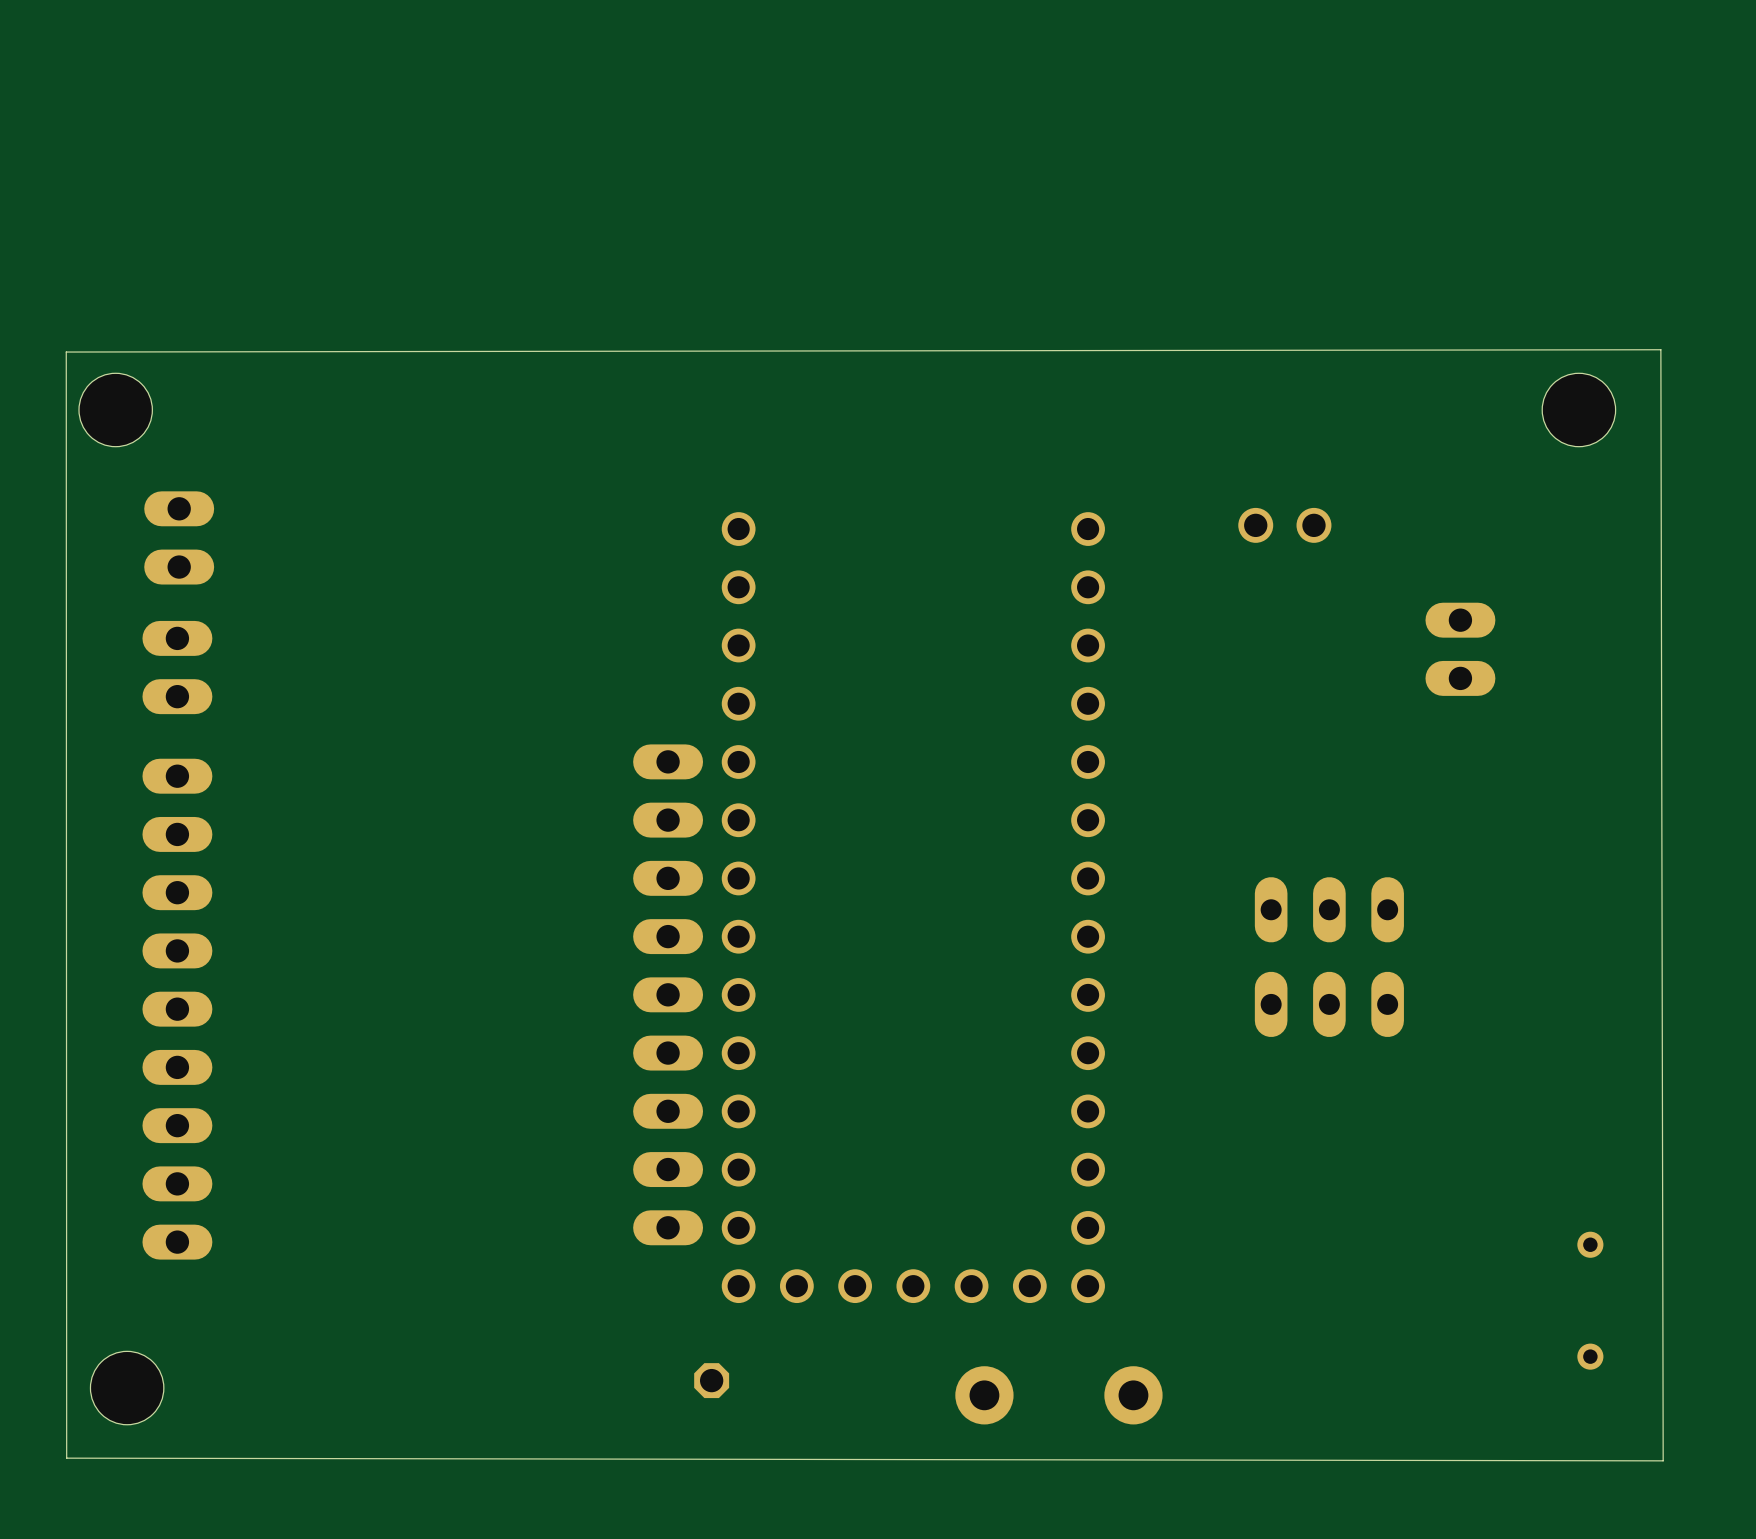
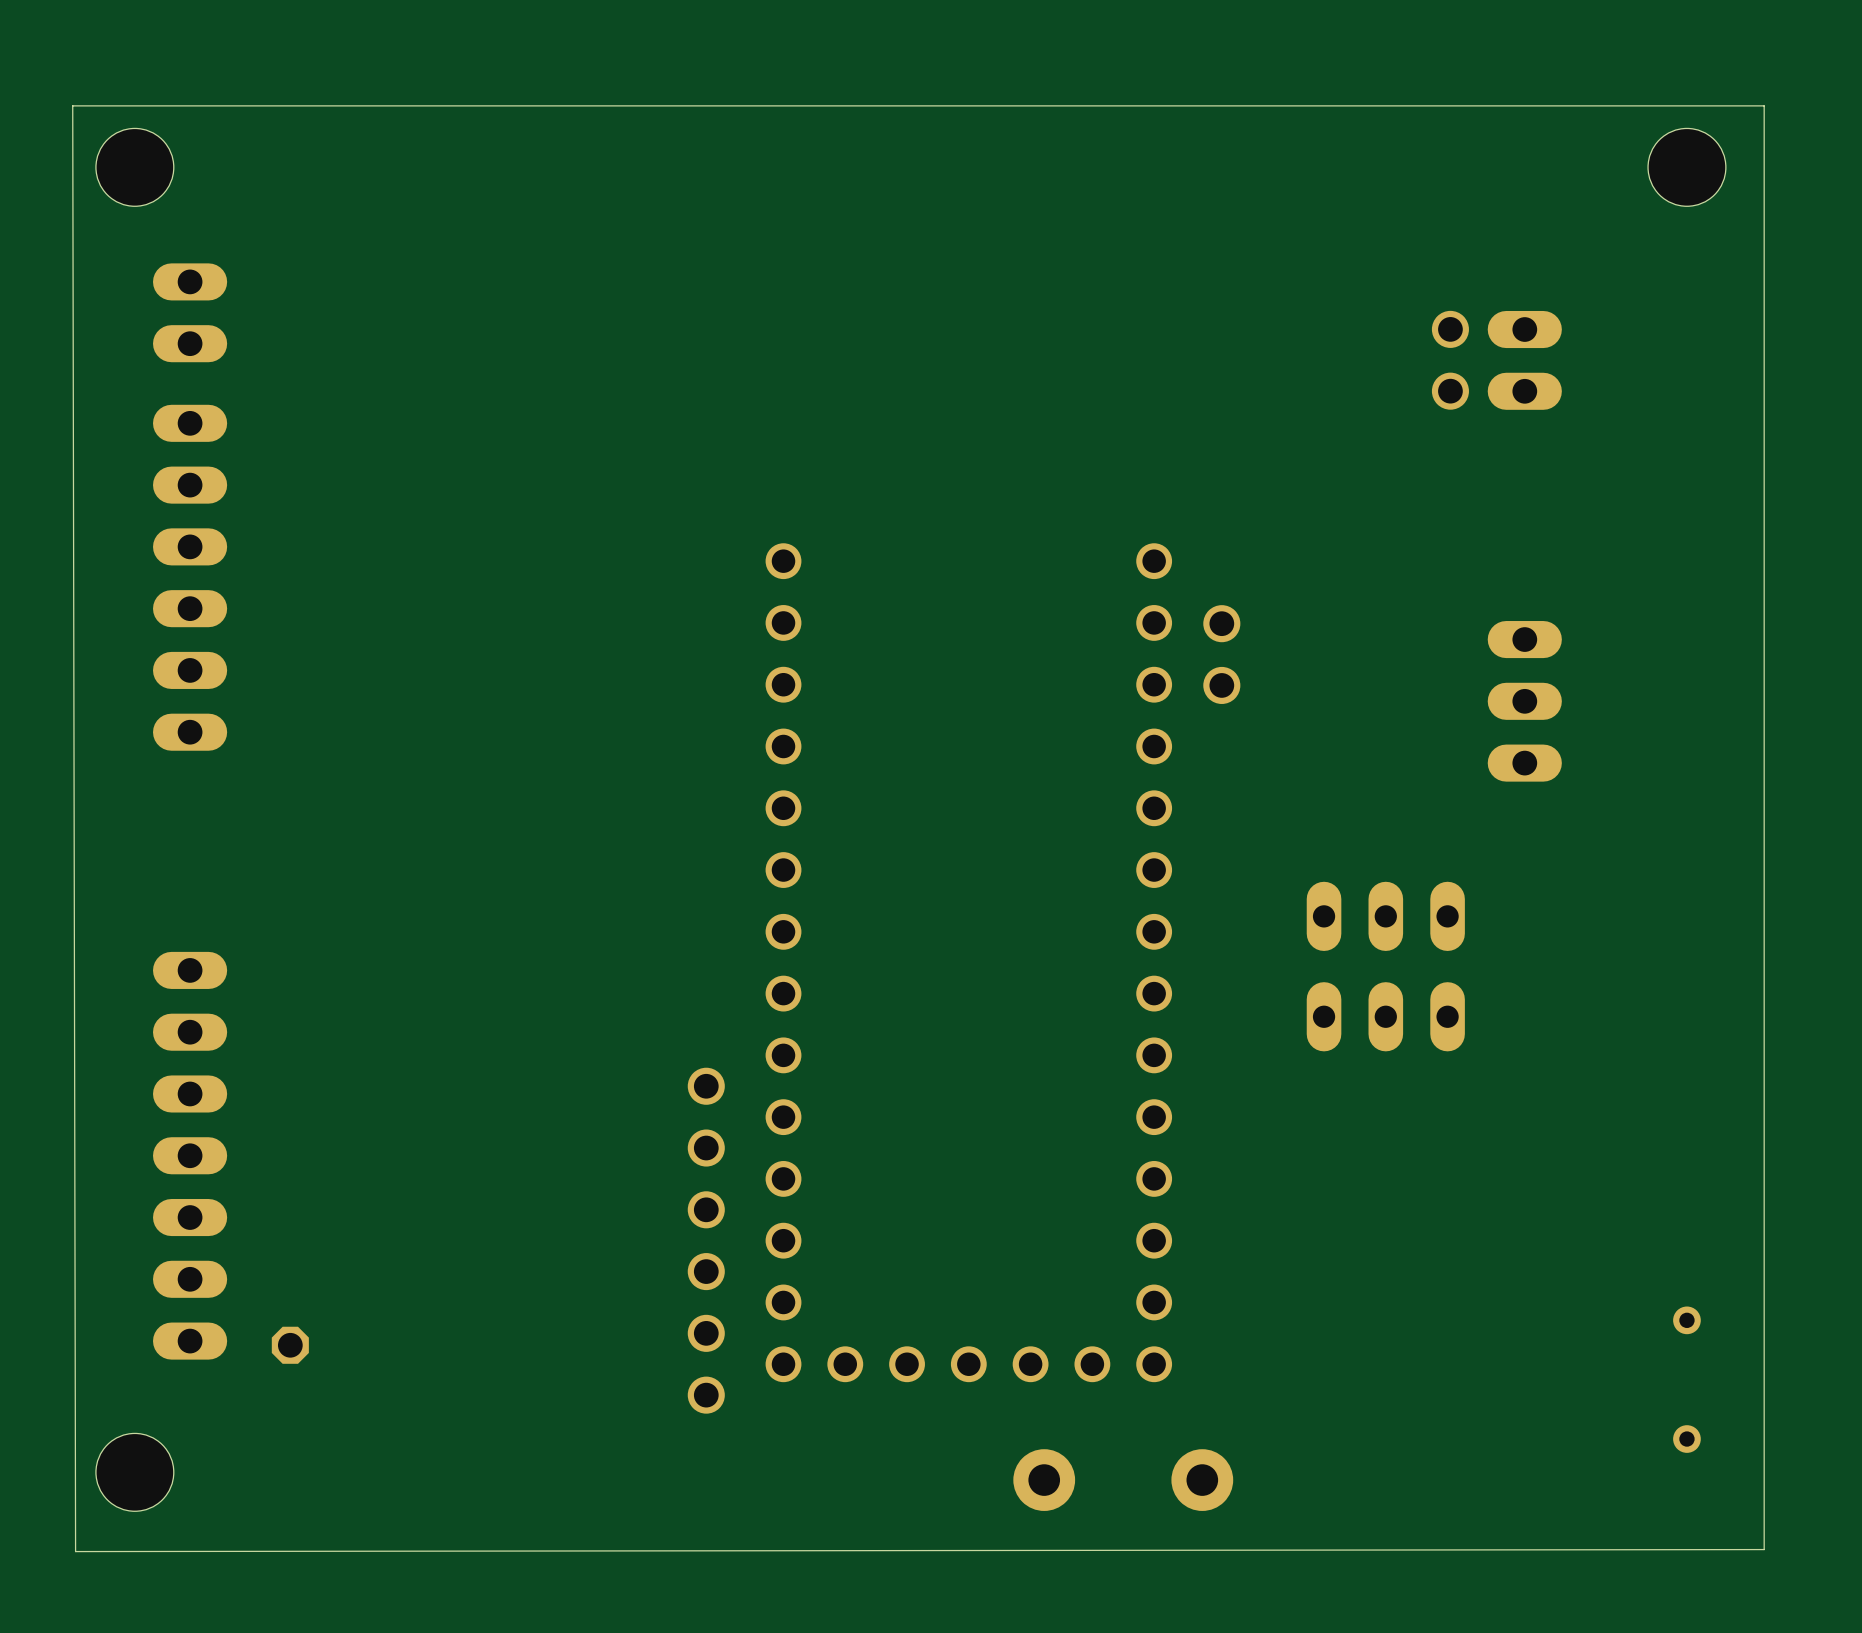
part: none -> (1450, 360)
board edge: (1660, 349) (66, 352) (66, 1458) (1663, 1460) (1660, 349) -> (1764, 105) (1764, 1549) (75, 1551) (72, 105) (1764, 105)
hole position: (115, 409) -> (134, 167)
hole position: (1578, 409) -> (1686, 167)
part footprint: [144, 491, 215, 585] -> [153, 404, 228, 751]
part: (1284, 525) -> none
part: none -> (1221, 654)
part position: (1460, 649) -> (1524, 360)
part: none -> (1524, 701)
part position: (177, 667) -> (190, 312)
part: none -> (1385, 916)
part: (1329, 909) -> none
part: none -> (1385, 1016)
part: (668, 994) -> none
part: (1329, 1004) -> none
part: (177, 1009) -> none
part: none -> (190, 1155)
part: none -> (706, 1240)
part position: (711, 1380) -> (290, 1345)

